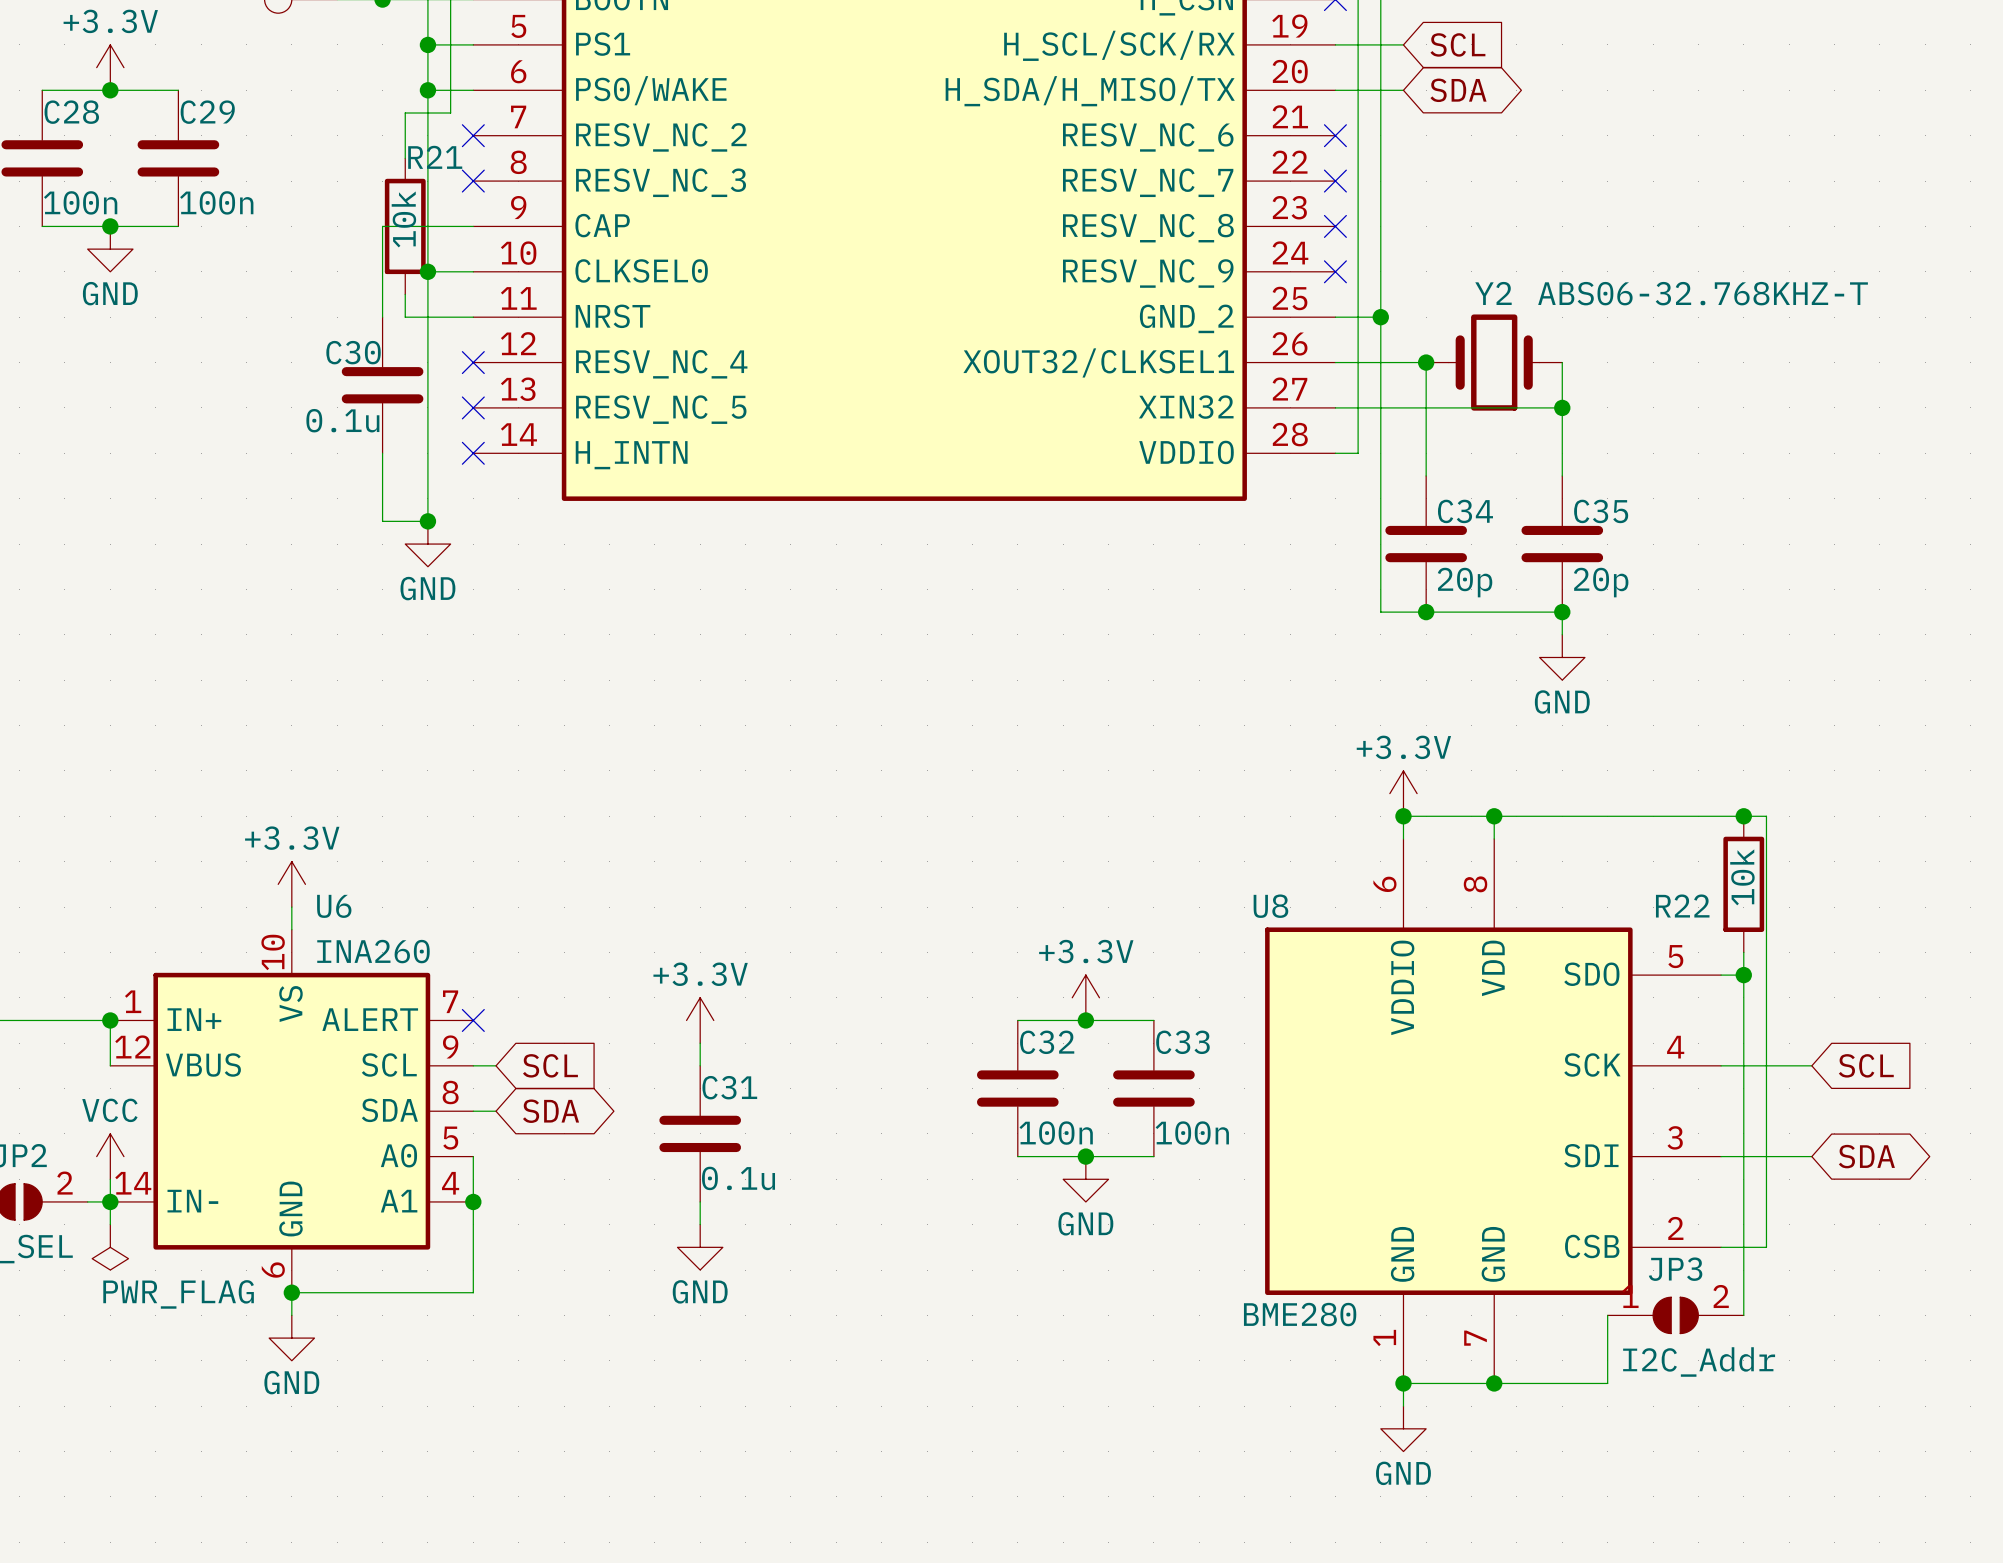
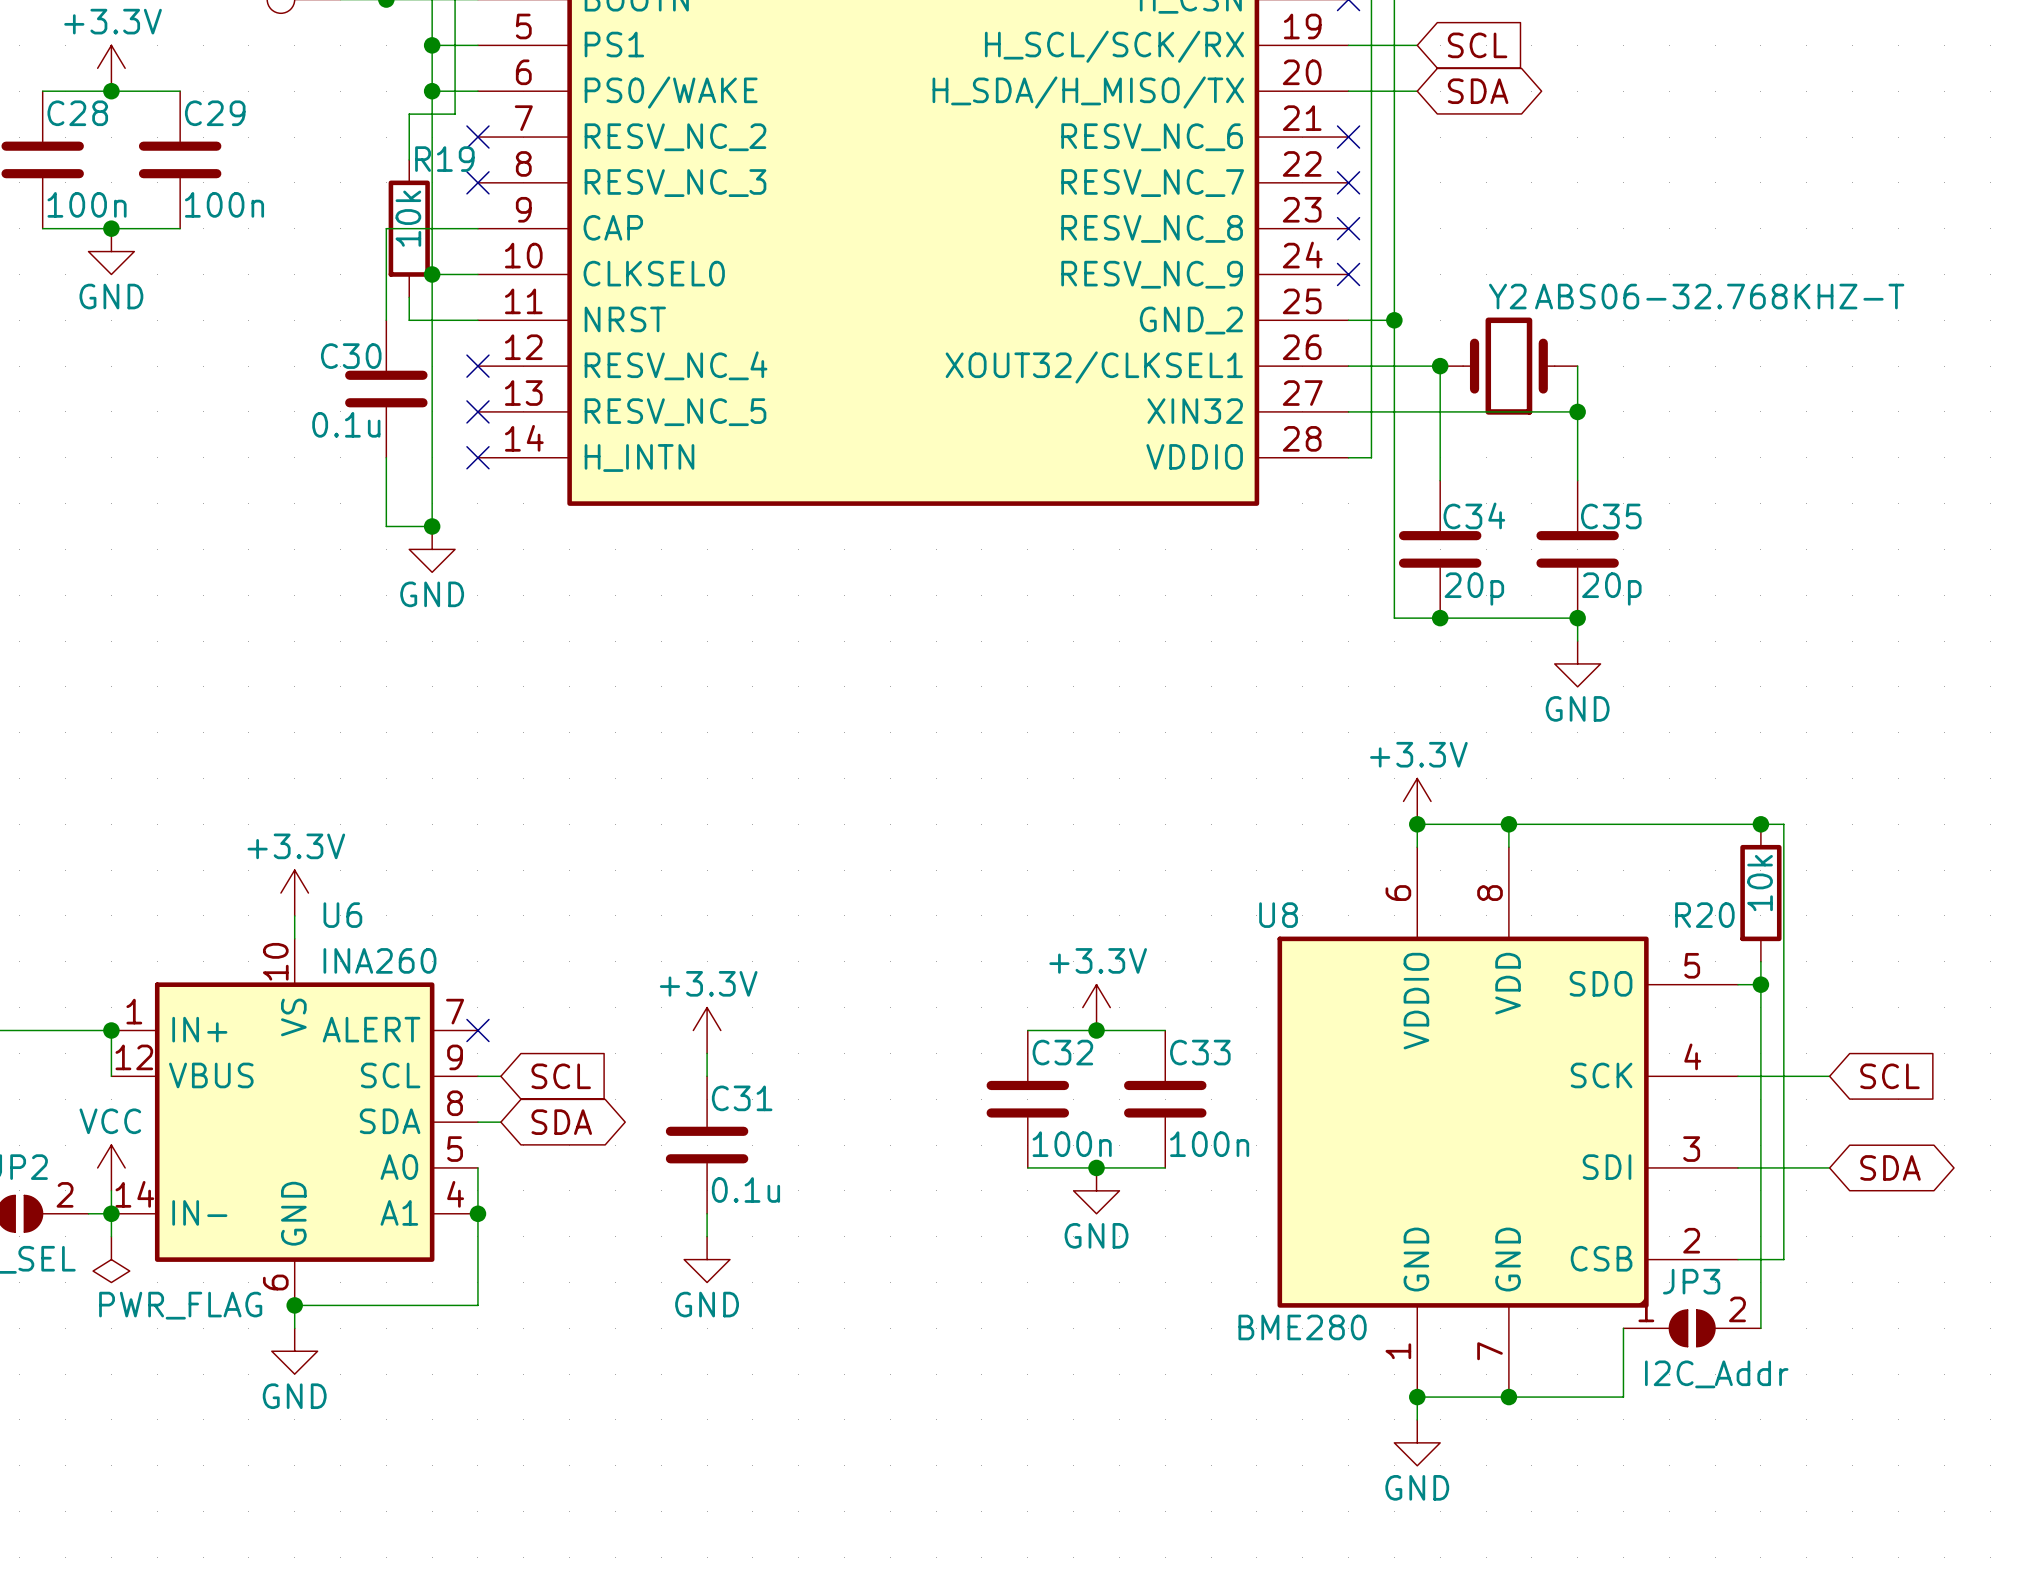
R21 name: R21 (435, 157) -> R19 (444, 159)
R22 name: R22 (1682, 905) -> R20 (1704, 915)

